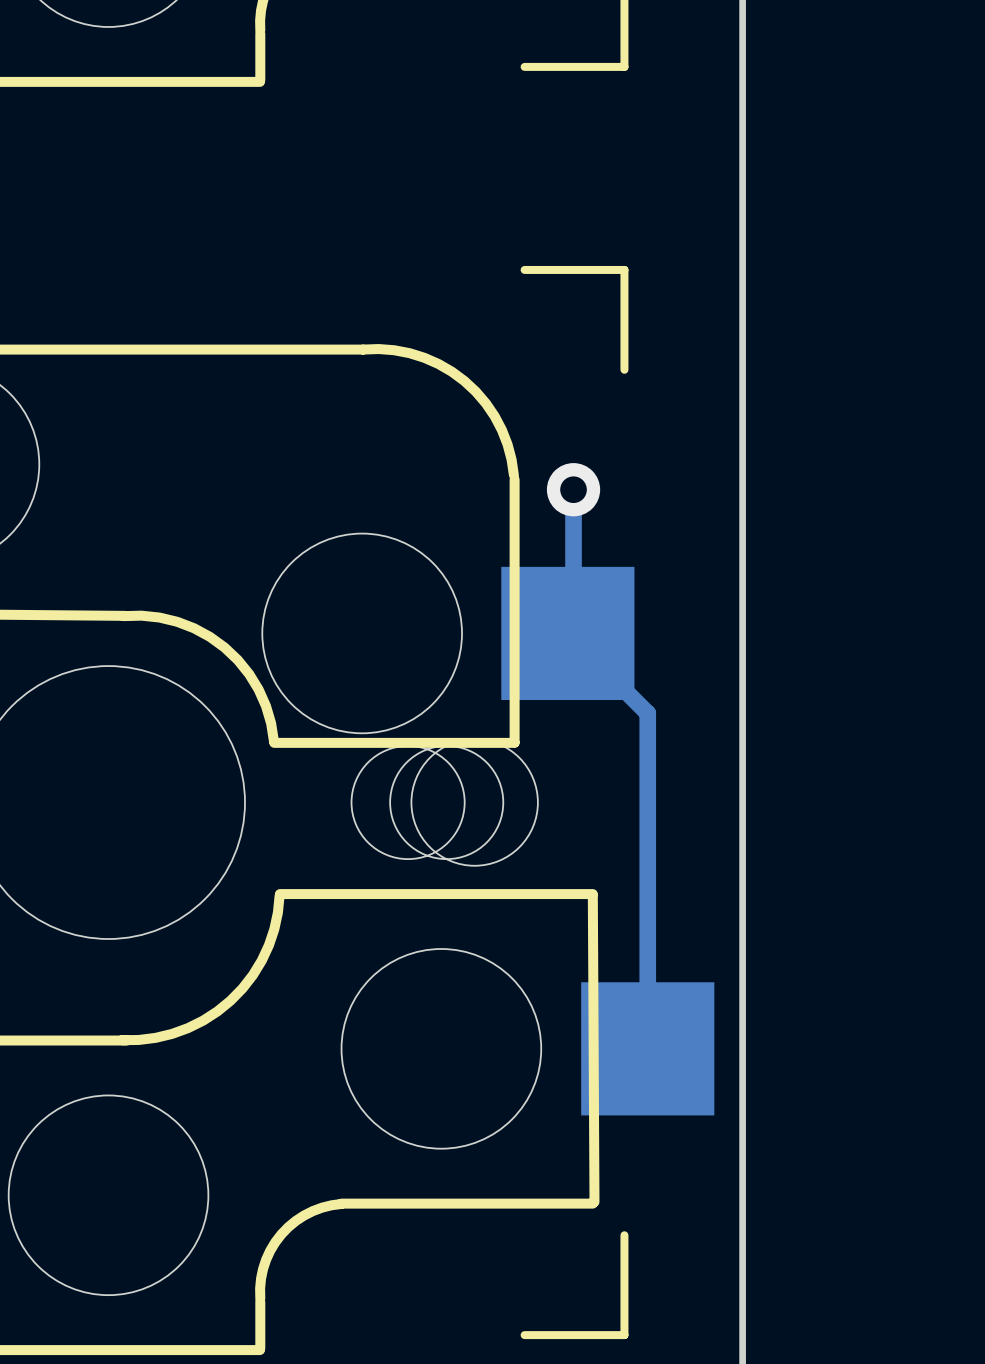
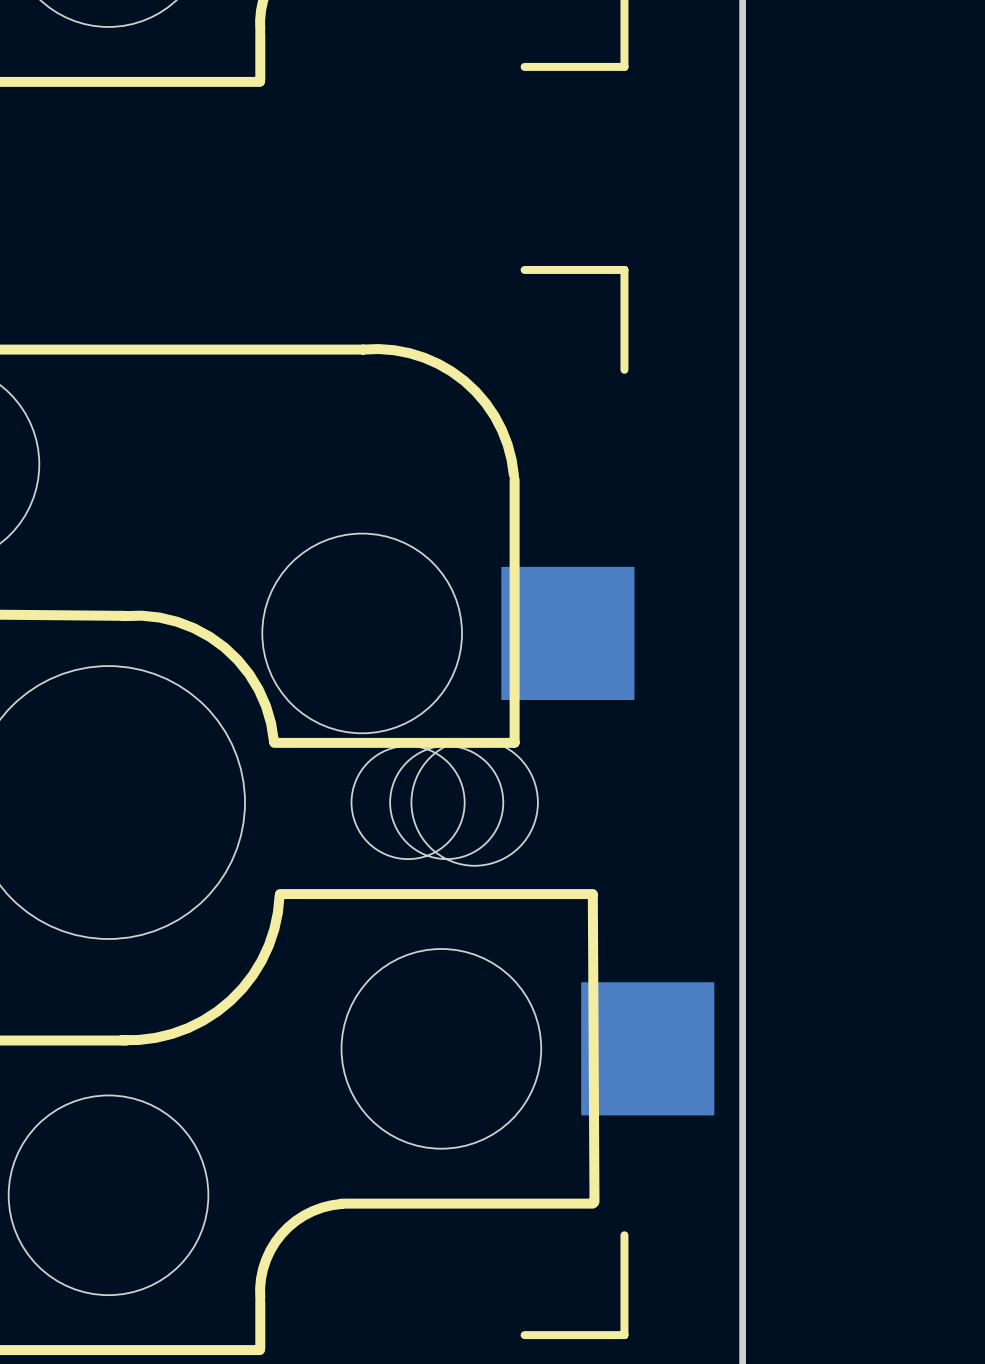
track: (573, 489) (573, 627) (567, 633) (647, 713) (647, 1048) -> none
via: (573, 489) -> none

